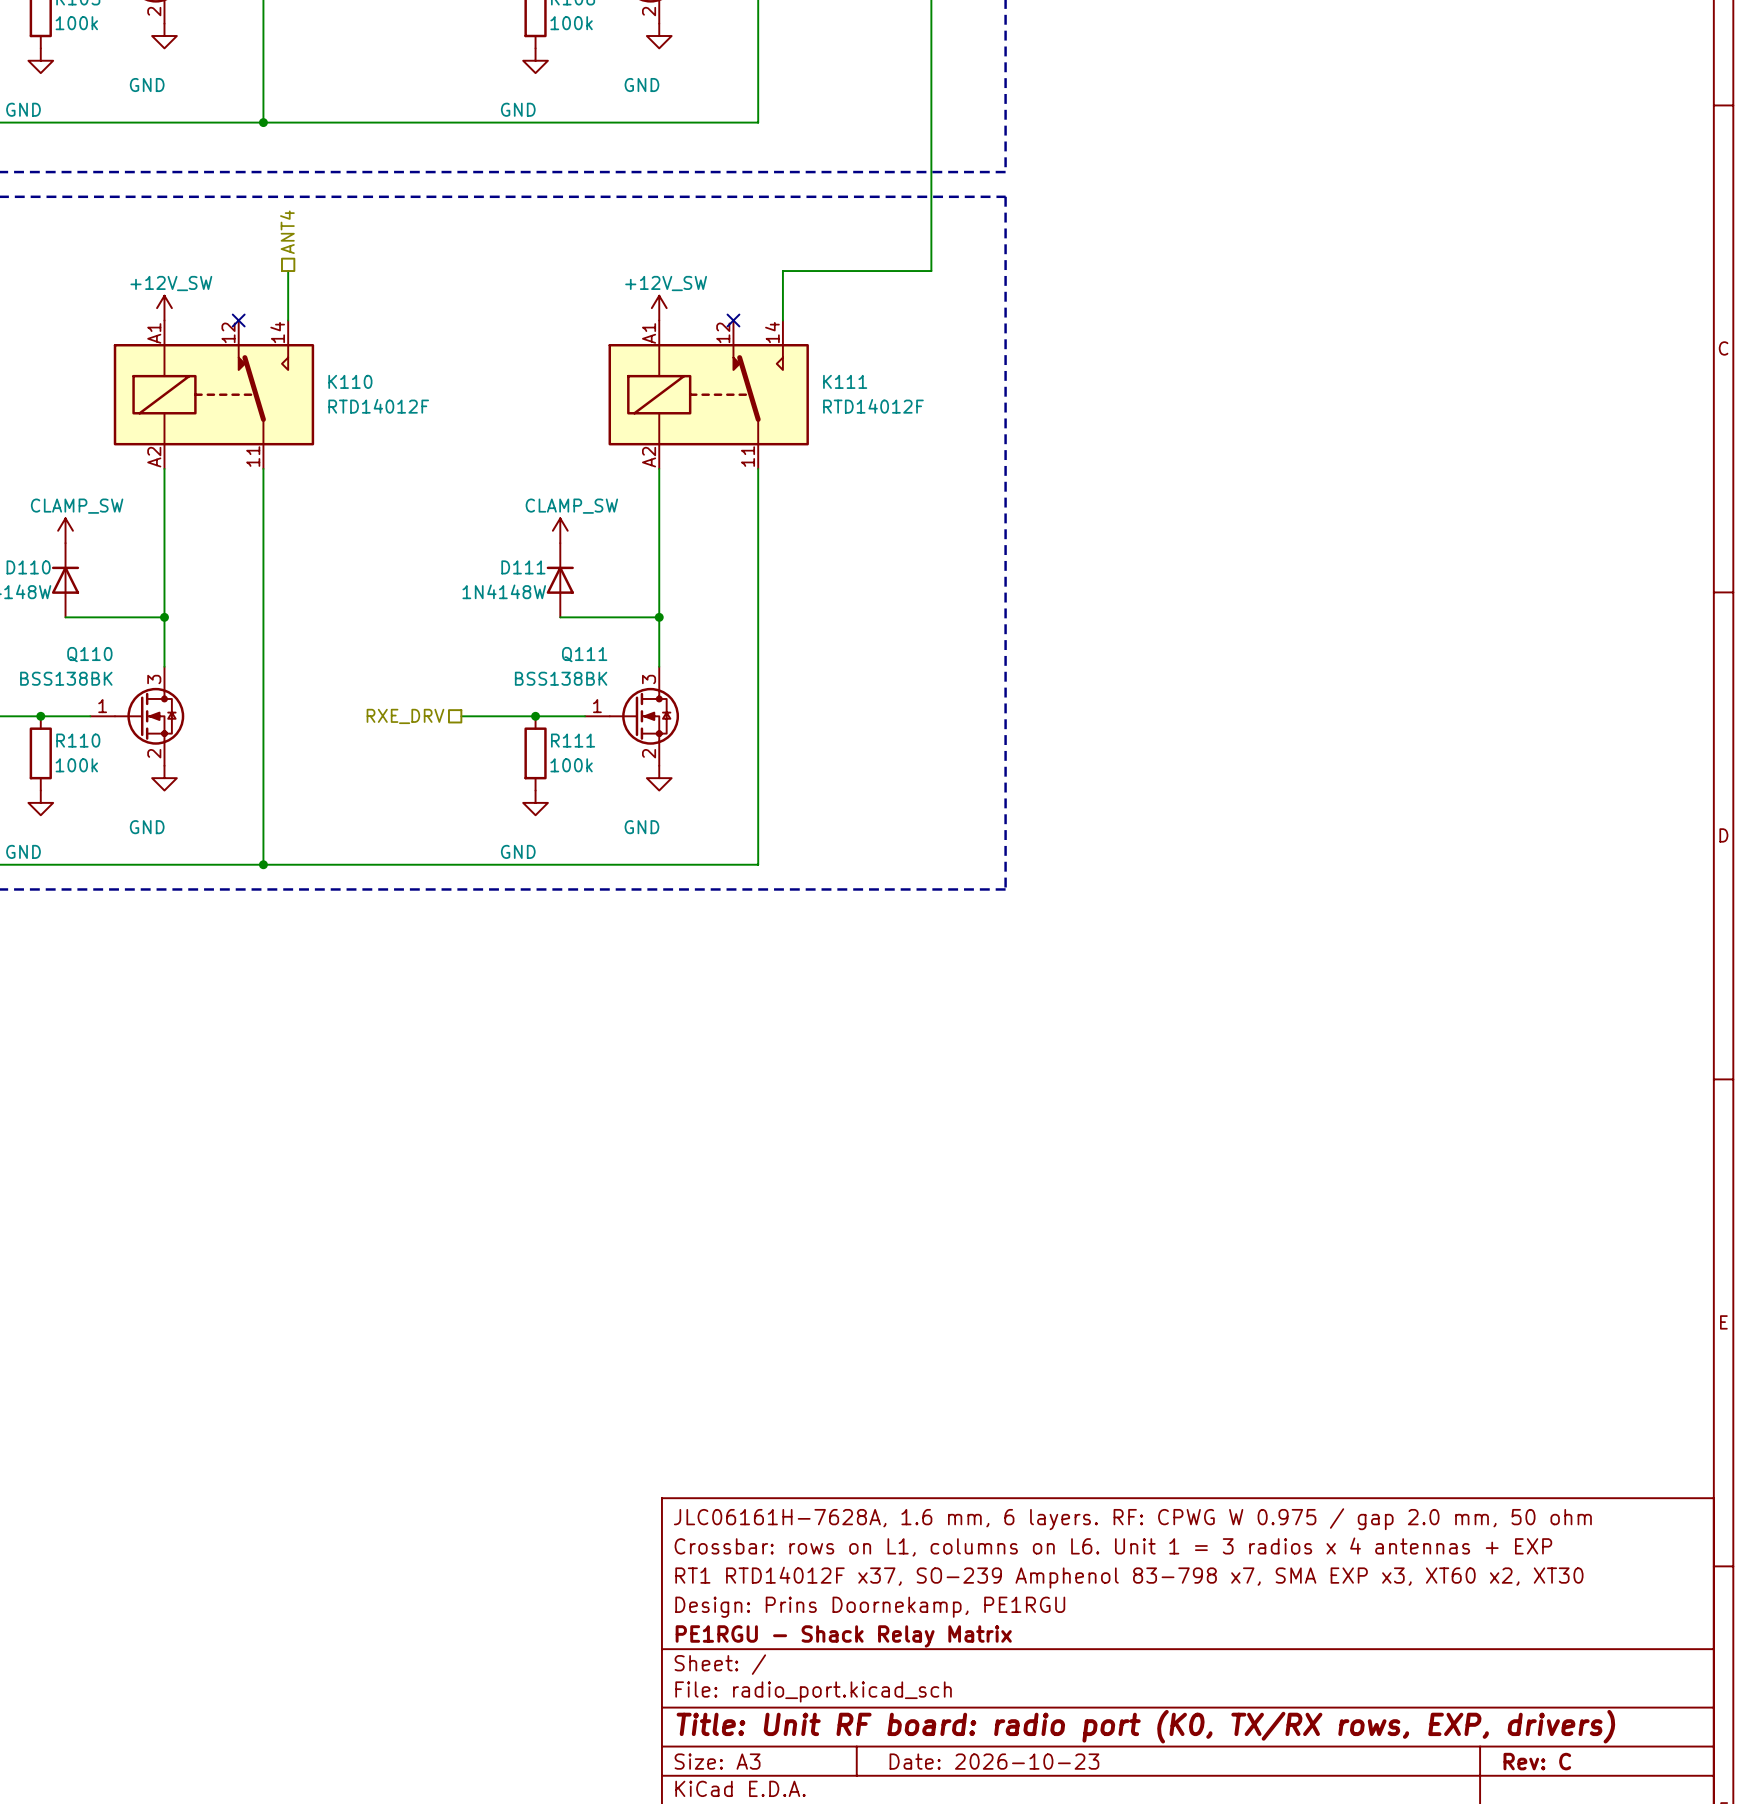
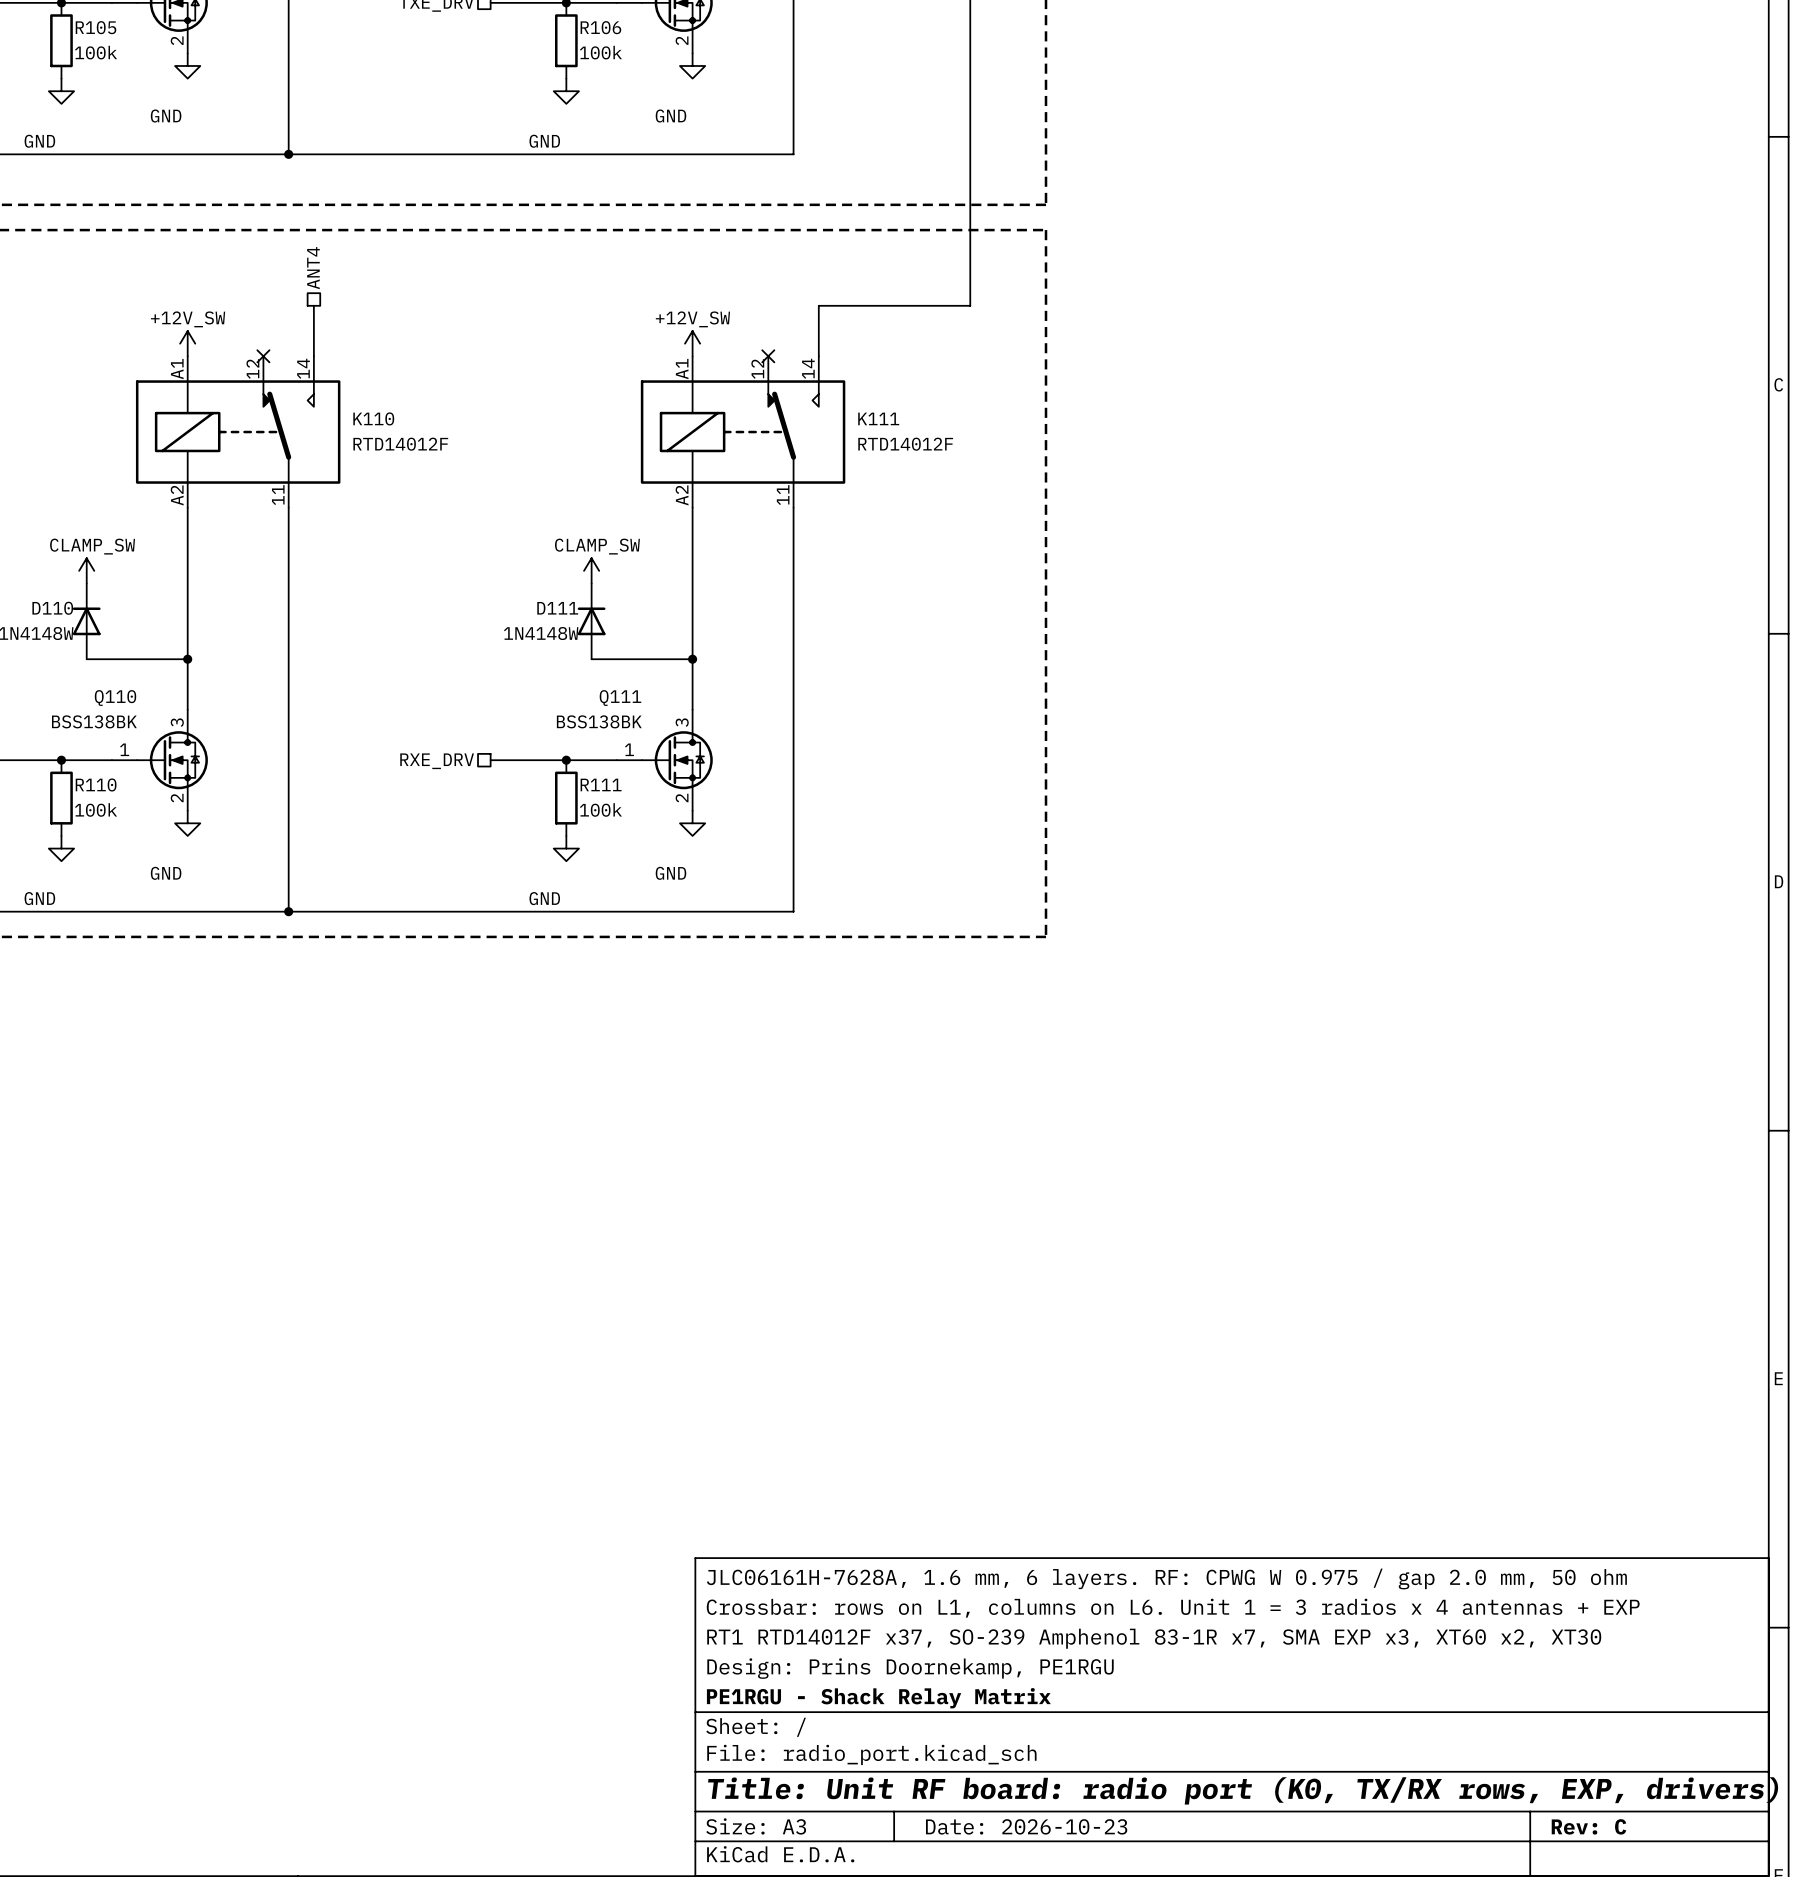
title block: RT1 RTD14012F x37, SO-239 Amphenol 83-798 x7, SMA EXP x3, XT60 x2, XT30 (1129, 1577) -> RT1 RTD14012F x37, SO-239 Amphenol 83-1R x7, SMA EXP x3, XT60 x2, XT30 (1154, 1638)

